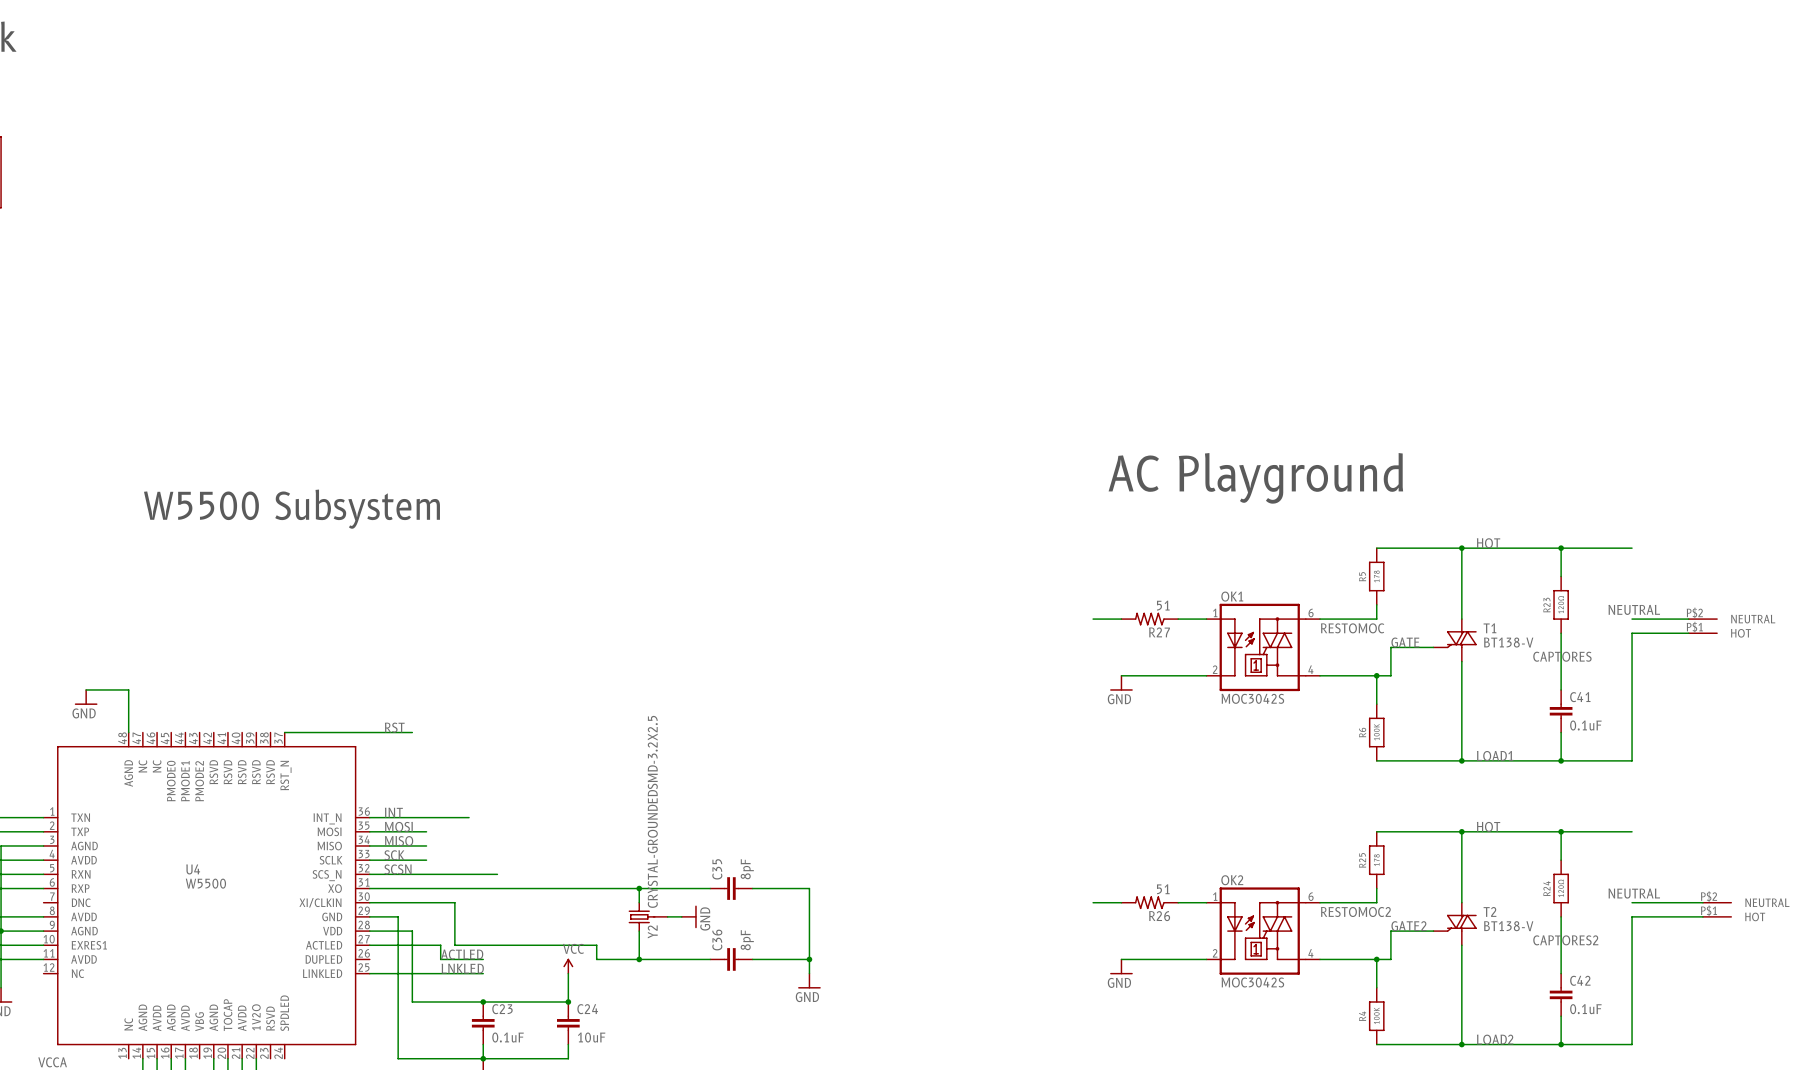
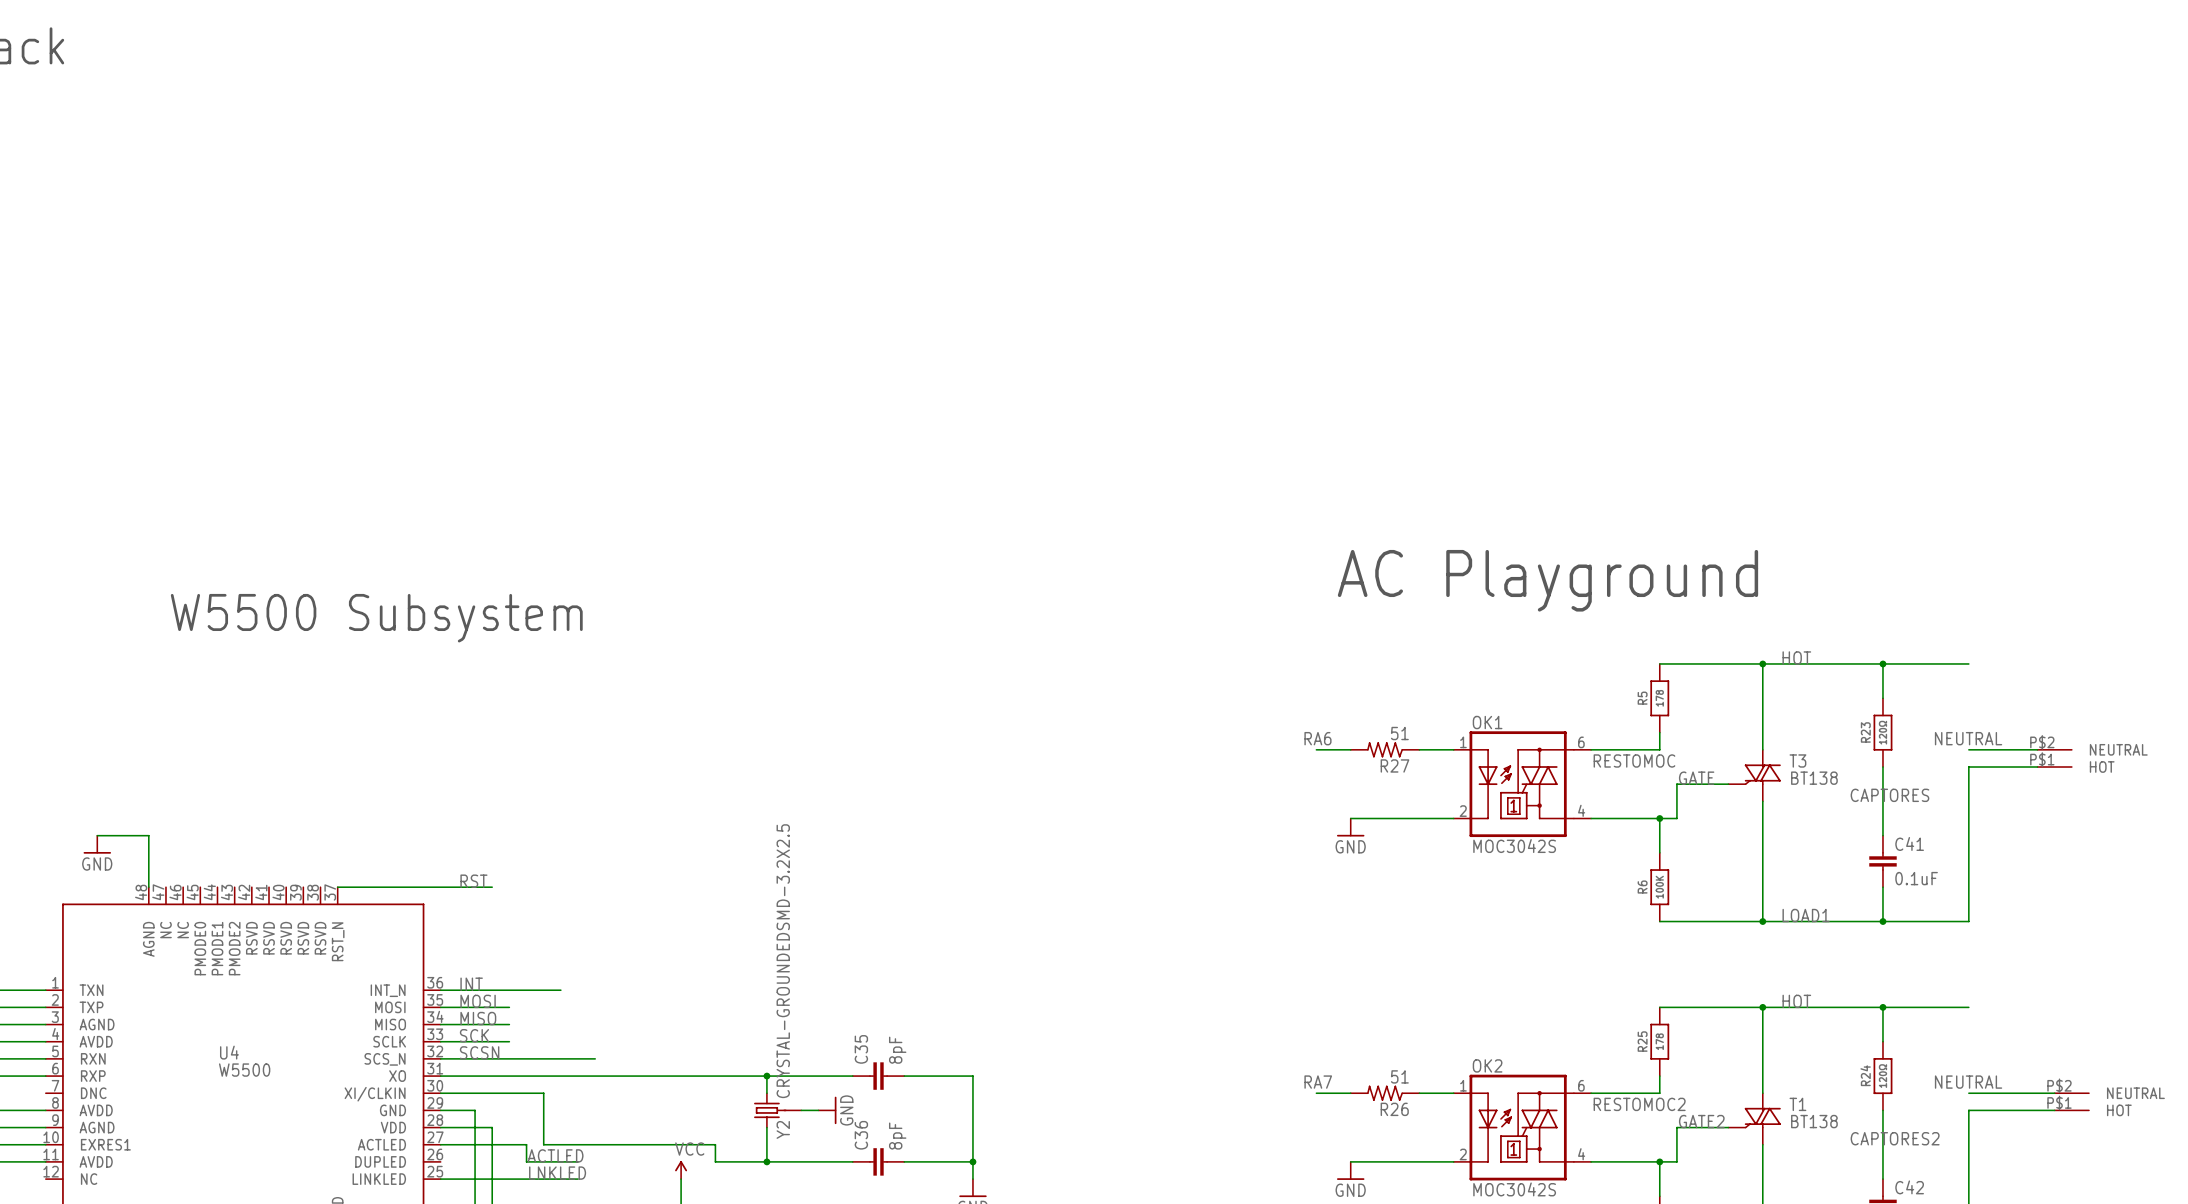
label: none -> RA6 (1317, 738)
T1 name: T1 (1489, 628) -> T3 (1797, 760)
T1 value: BT138-V (1508, 642) -> BT138 (1814, 778)
label: none -> RA7 (1318, 1082)
T2 name: T2 (1489, 911) -> T1 (1797, 1104)
T2 value: BT138-V (1508, 926) -> BT138 (1814, 1121)

